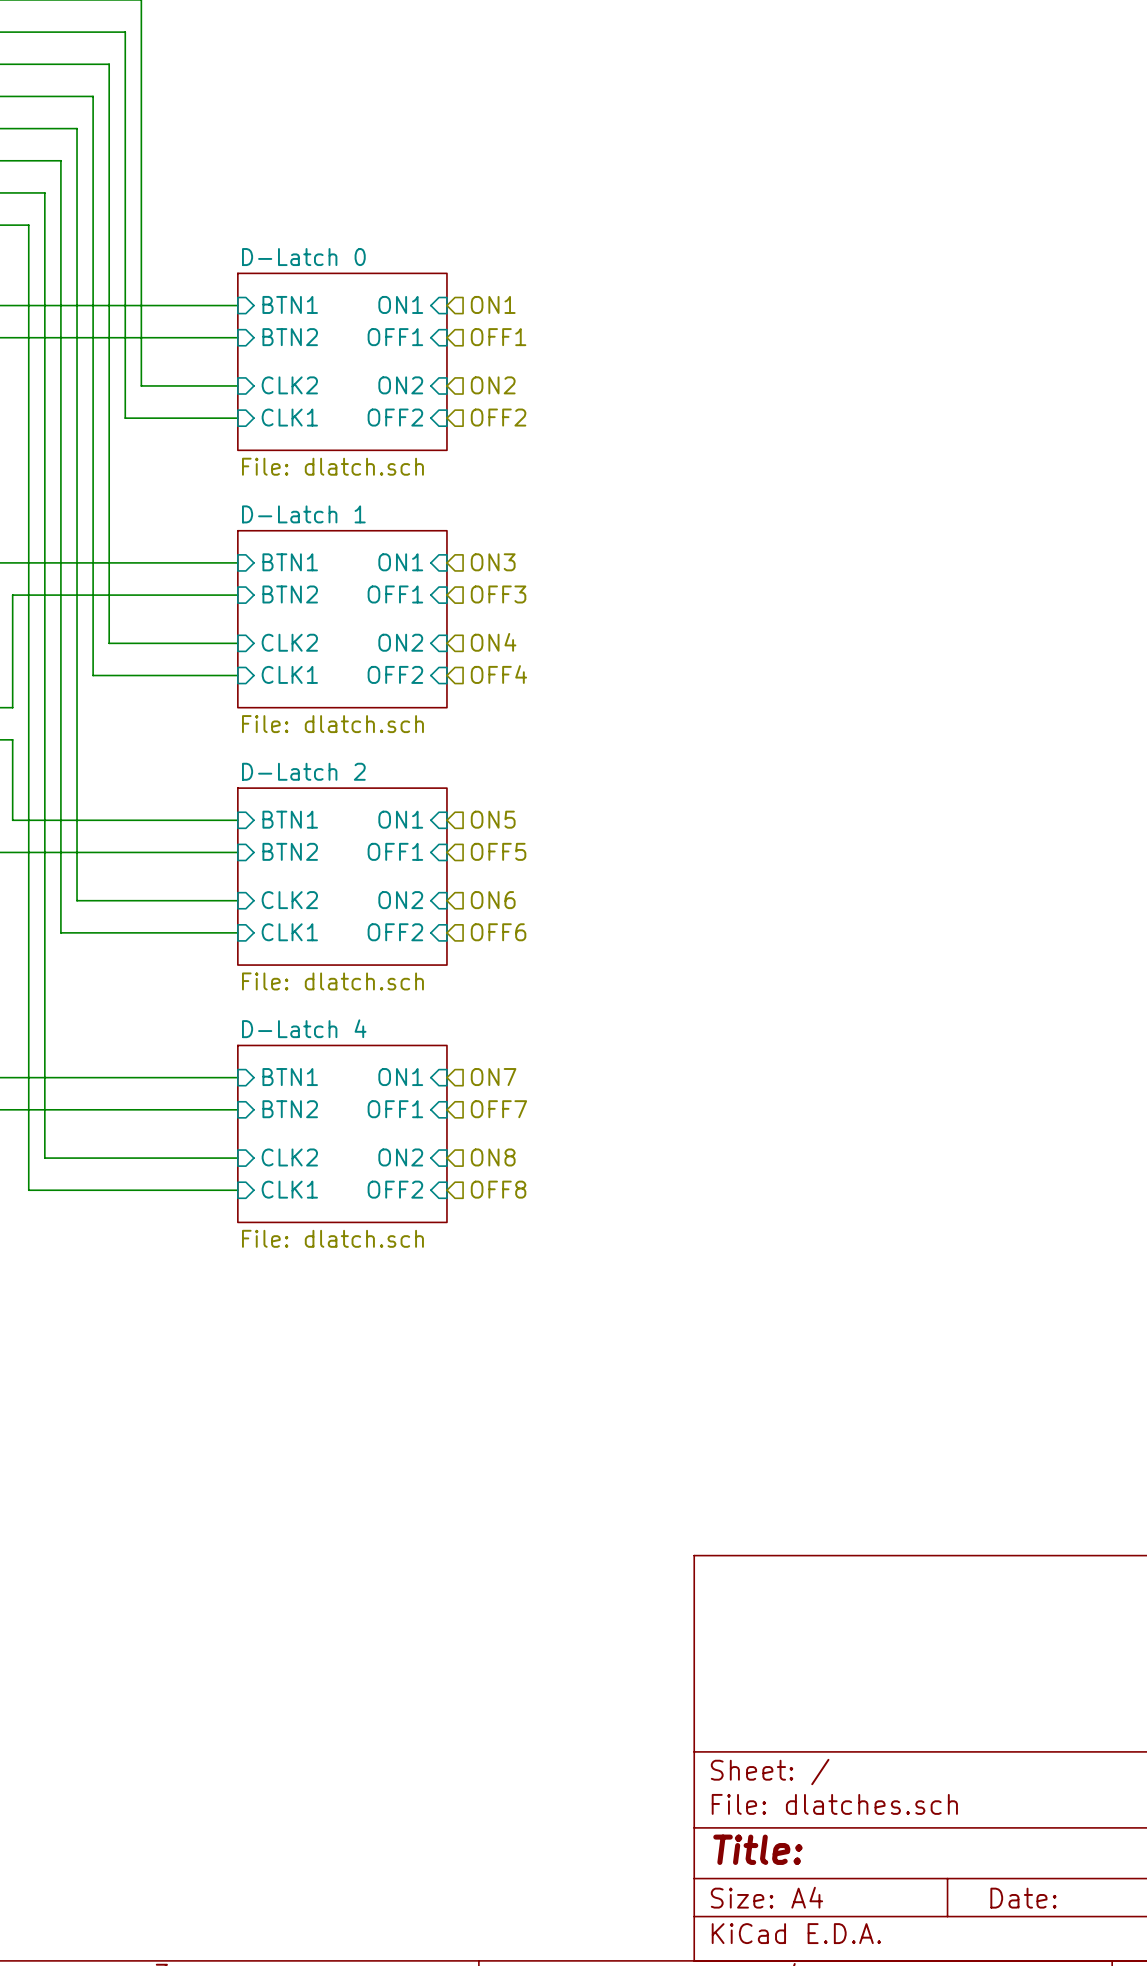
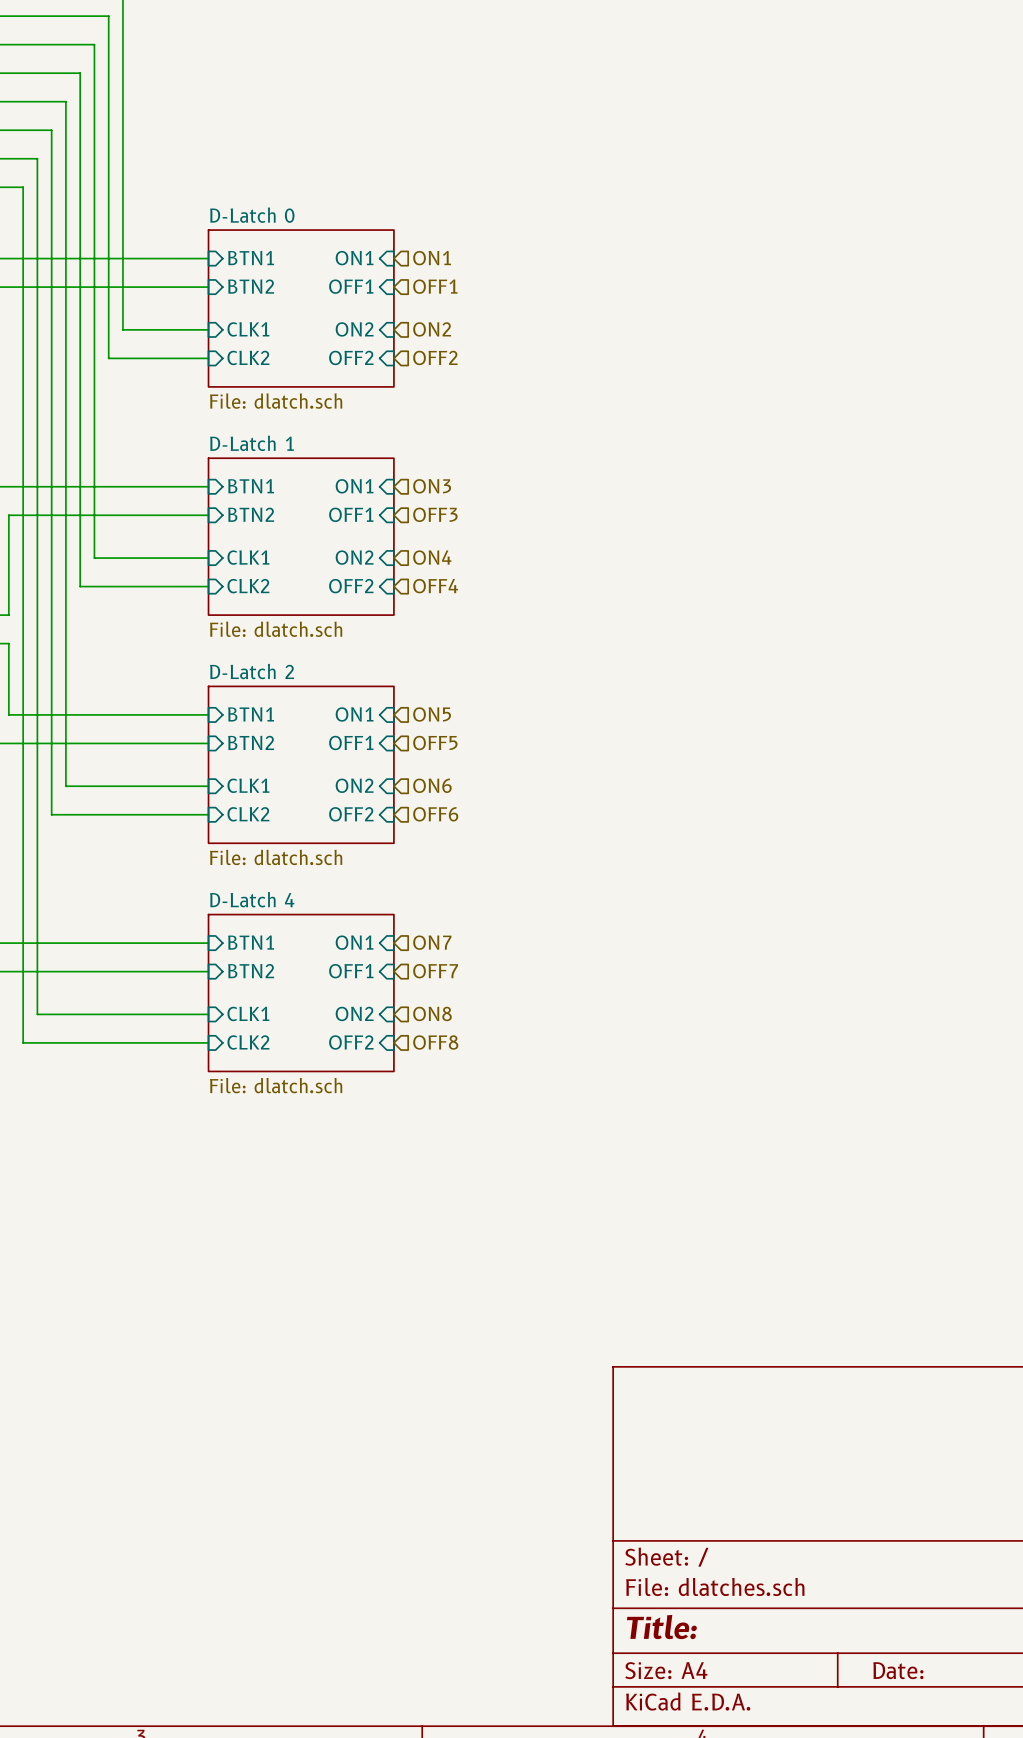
sheet pin: CLK2 (289, 385) -> CLK1 (248, 329)
sheet pin: CLK1 (289, 417) -> CLK2 (248, 357)
sheet pin: CLK2 (289, 642) -> CLK1 (248, 557)
sheet pin: CLK1 (289, 674) -> CLK2 (248, 586)
sheet pin: CLK2 (289, 900) -> CLK1 (248, 785)
sheet pin: CLK1 (289, 932) -> CLK2 (248, 814)
sheet pin: CLK2 (289, 1157) -> CLK1 (248, 1013)
sheet pin: CLK1 (289, 1189) -> CLK2 (248, 1042)

